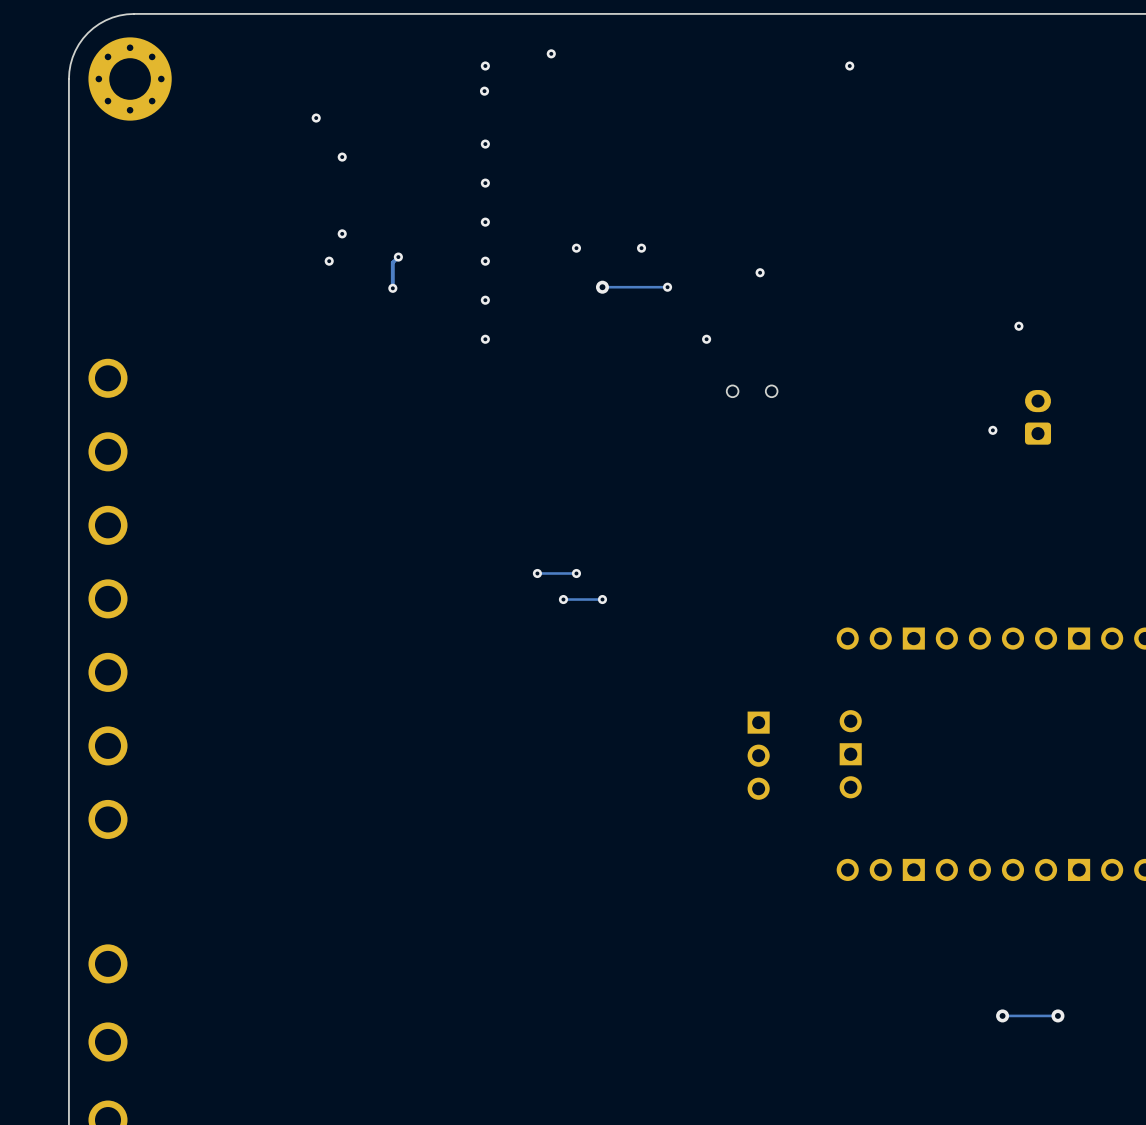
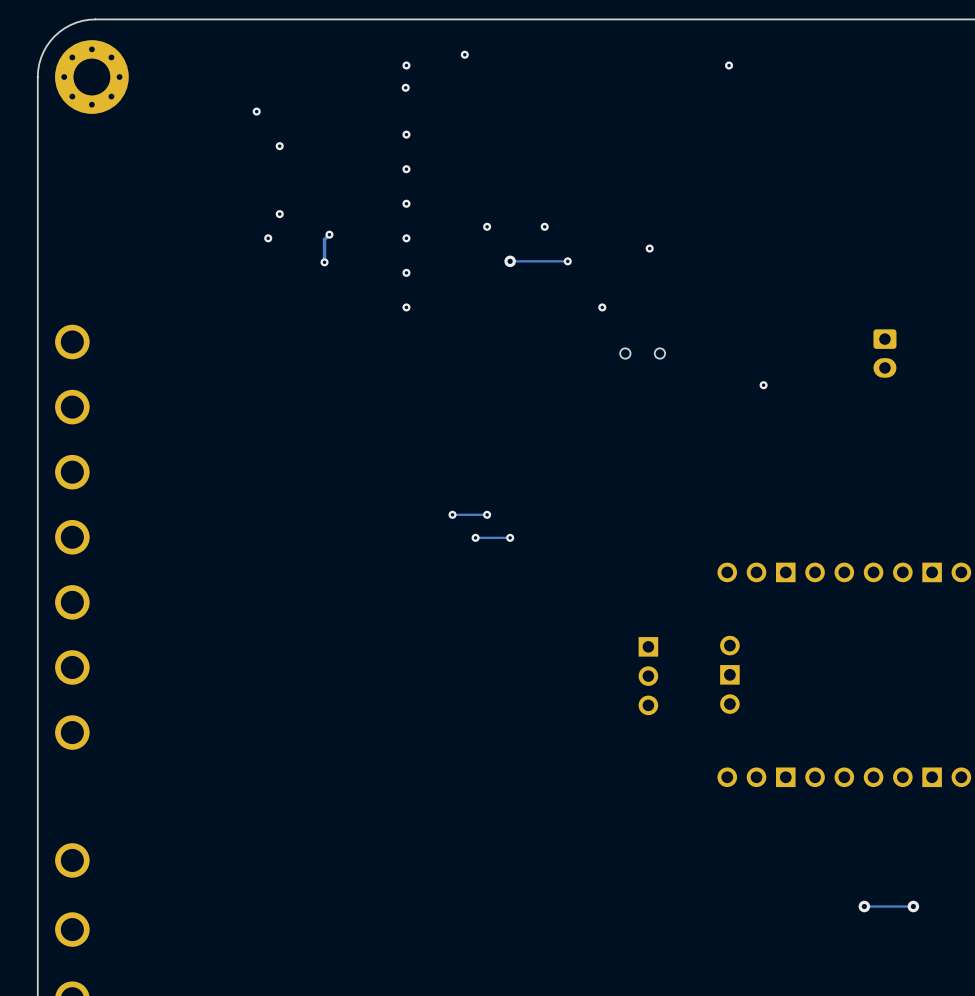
via: (1018, 326) -> none
part rotation: 0° (1038, 417) -> 180° (884, 353)
via: none -> (763, 385)
via: (992, 430) -> none

